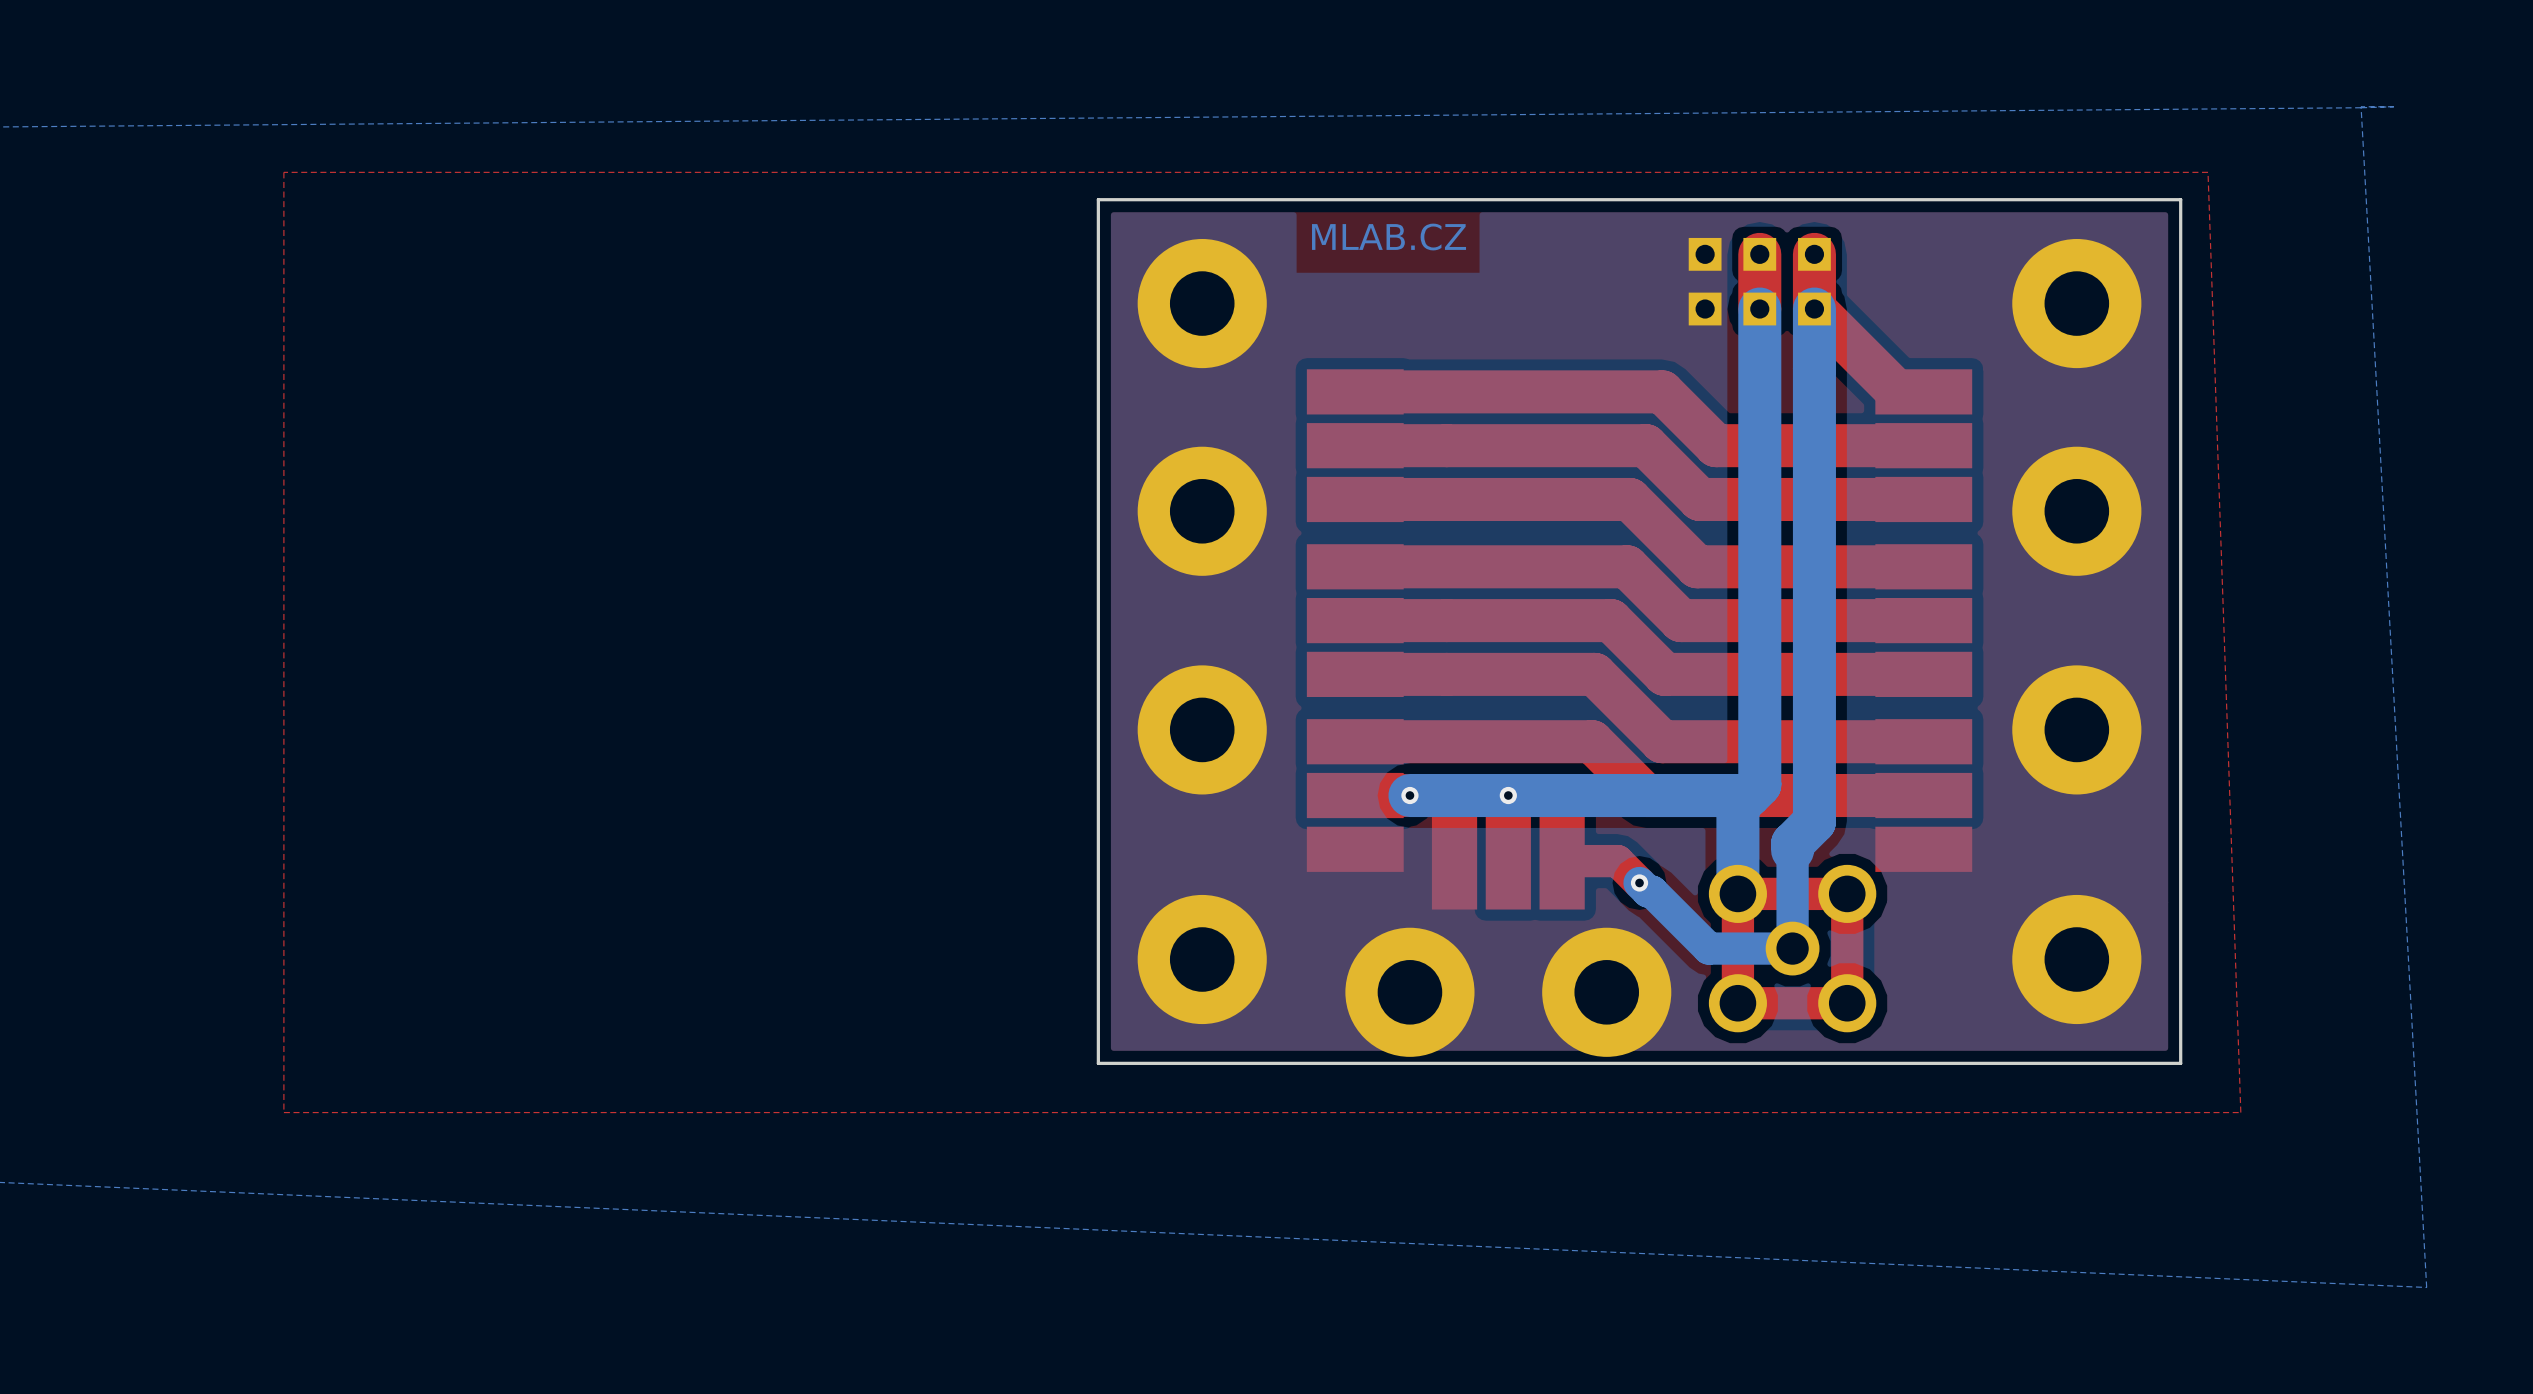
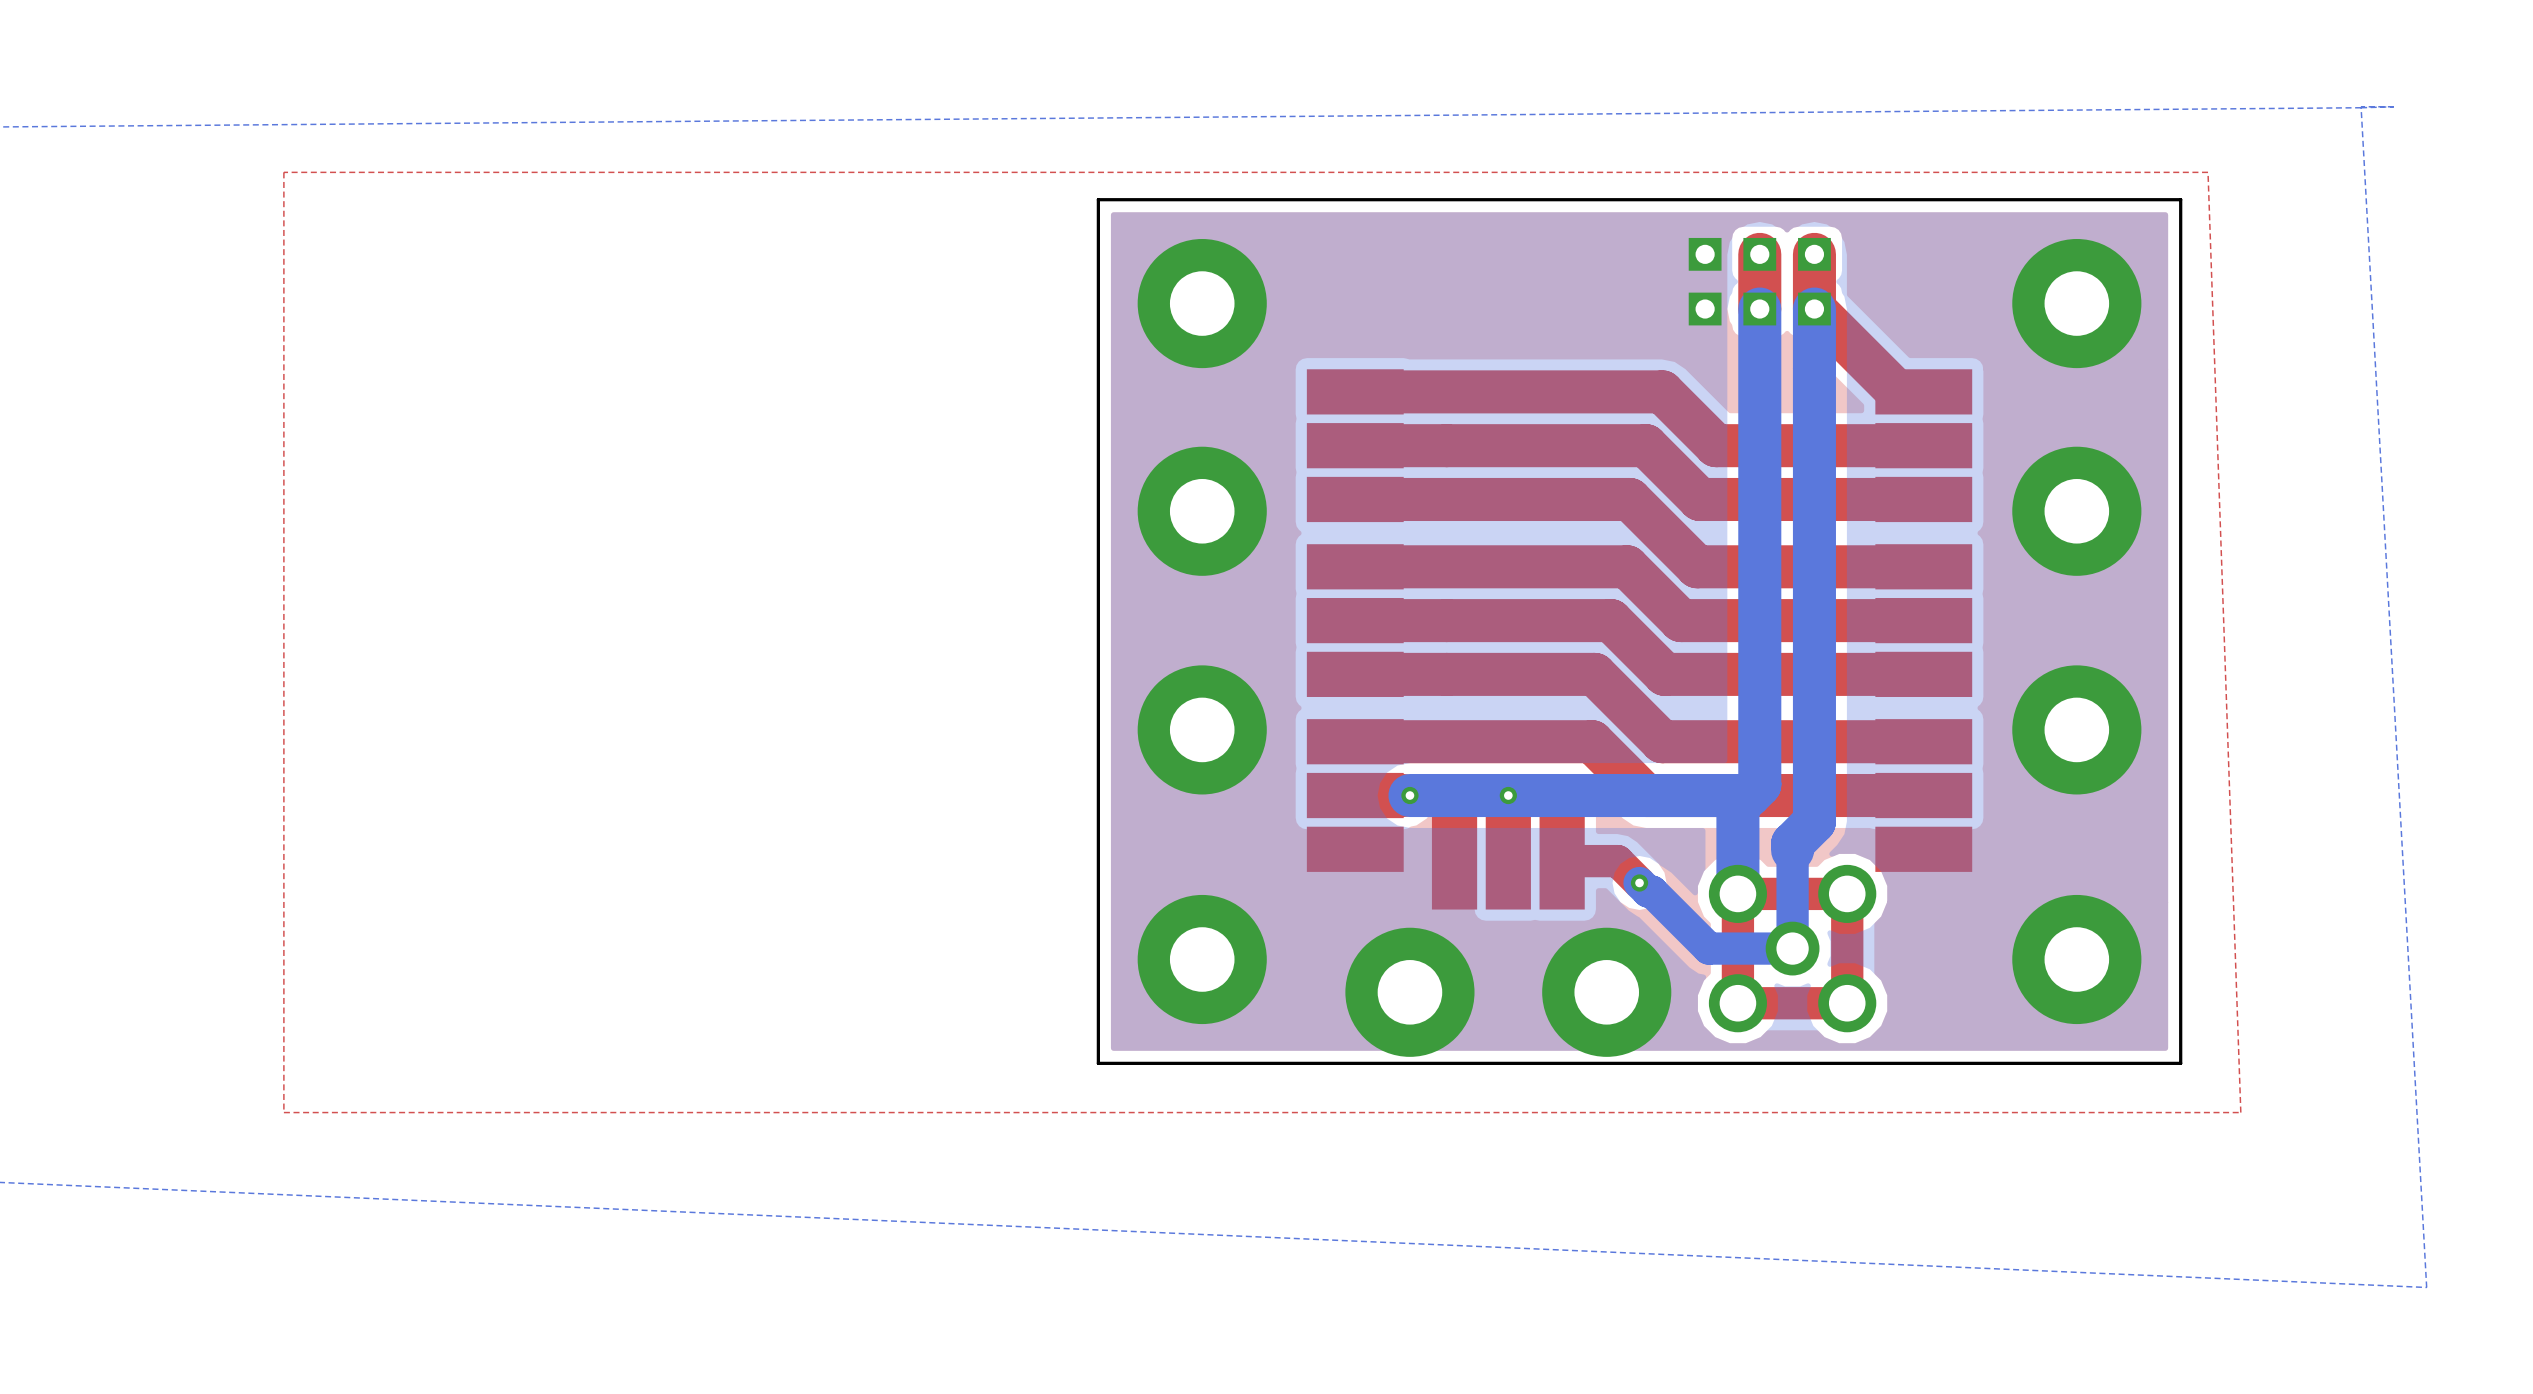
text: MLAB.CZ (1389, 237) -> none

